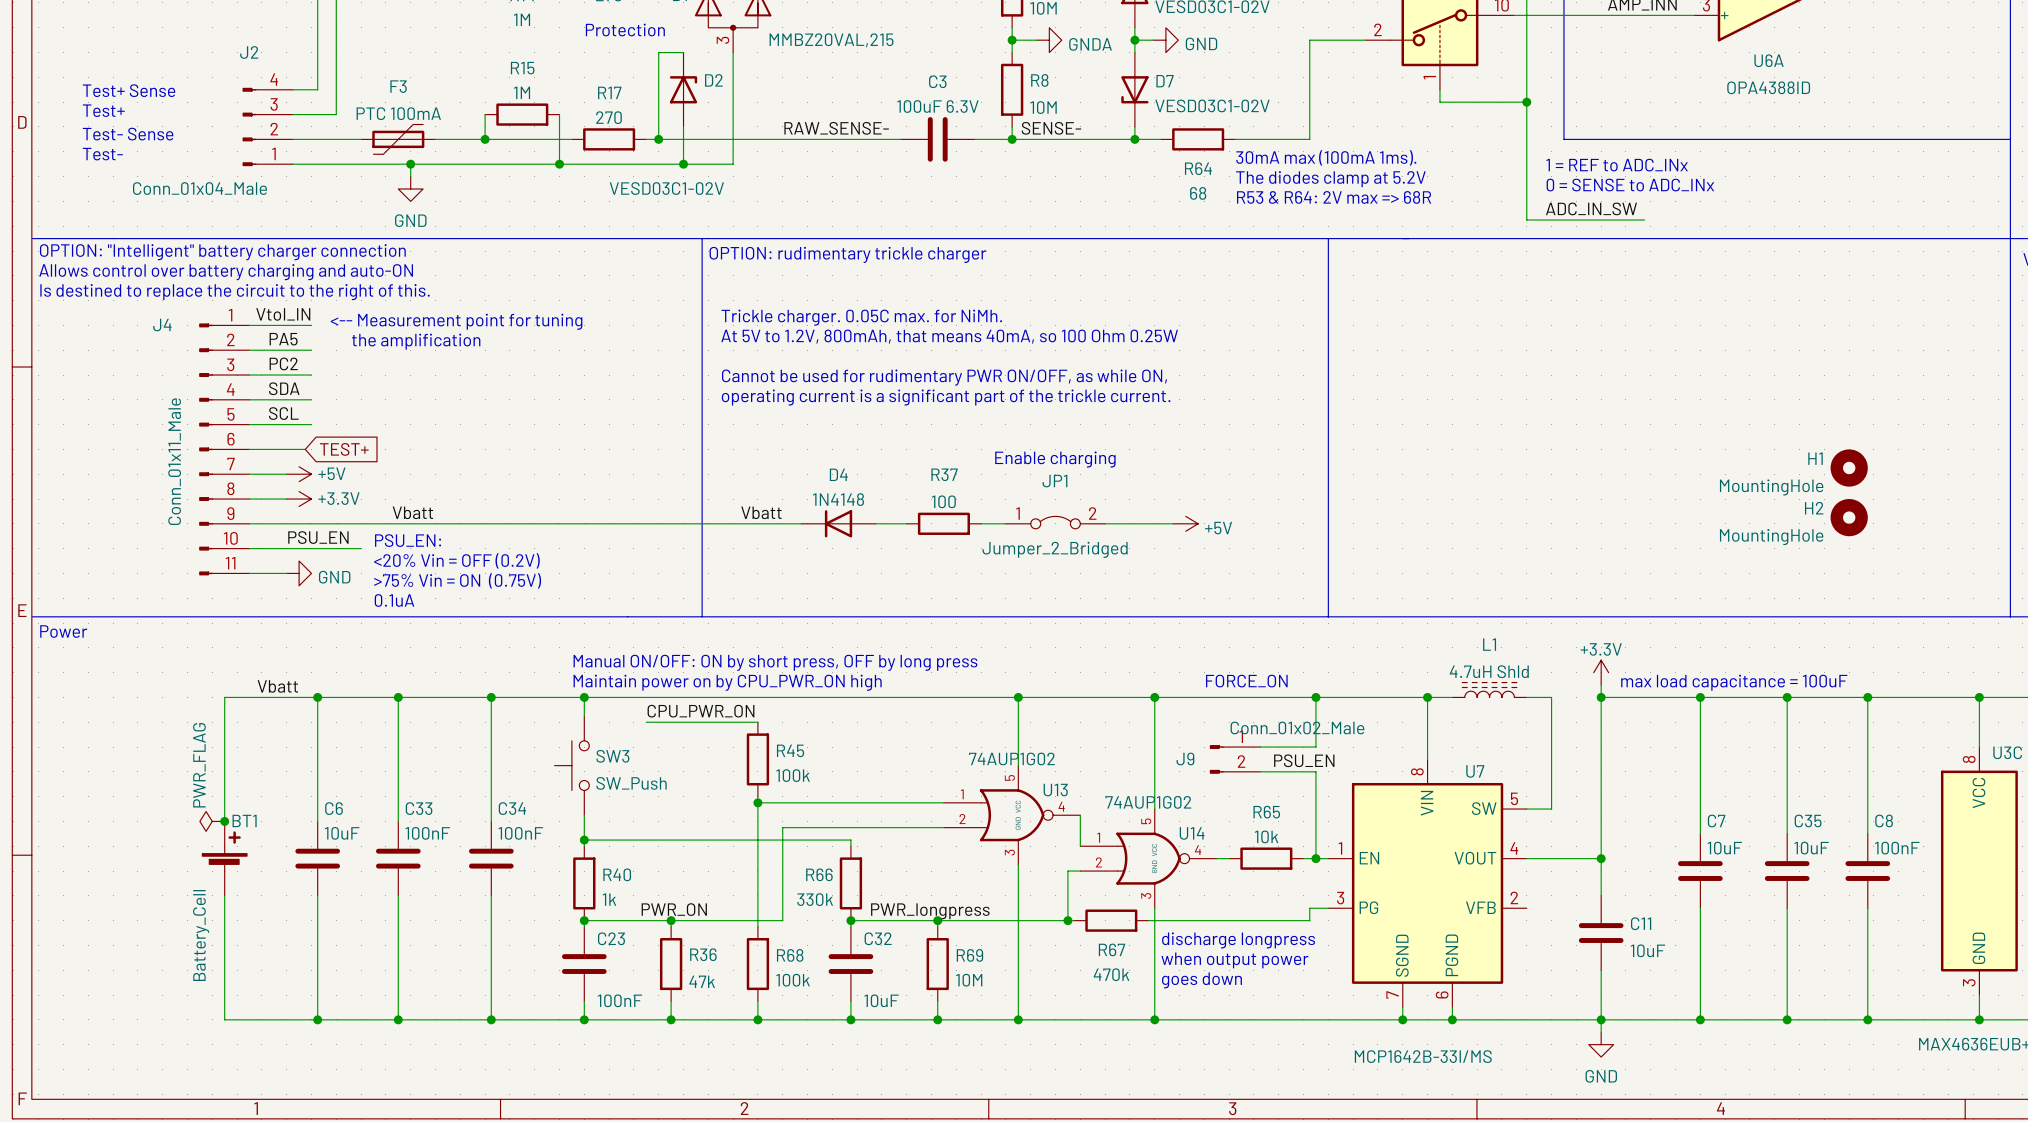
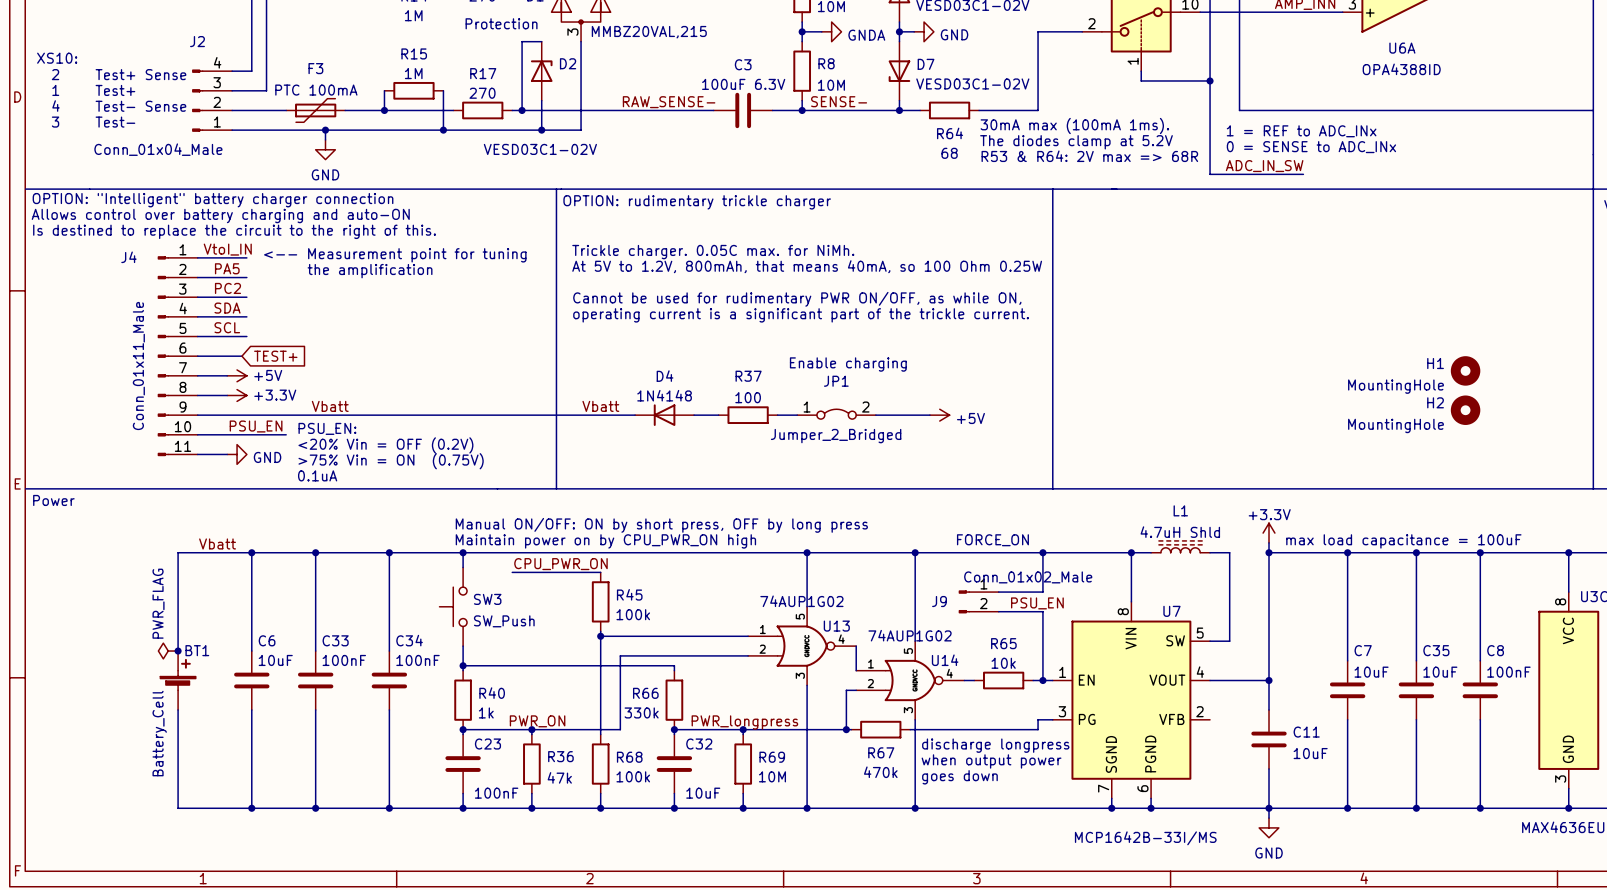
text: none -> XS10: (57, 58)
text position: Test+ Sense (129, 90) -> Test+ Sense (140, 74)
text: none -> 2 (55, 74)
text position: Test+ (103, 110) -> Test+ (115, 90)
text: none -> 1 (55, 90)
text: none -> 4 (56, 106)
text position: Test- Sense (128, 134) -> Test- Sense (140, 106)
text: none -> 3 (55, 122)
text position: Test- (102, 154) -> Test- (115, 122)

